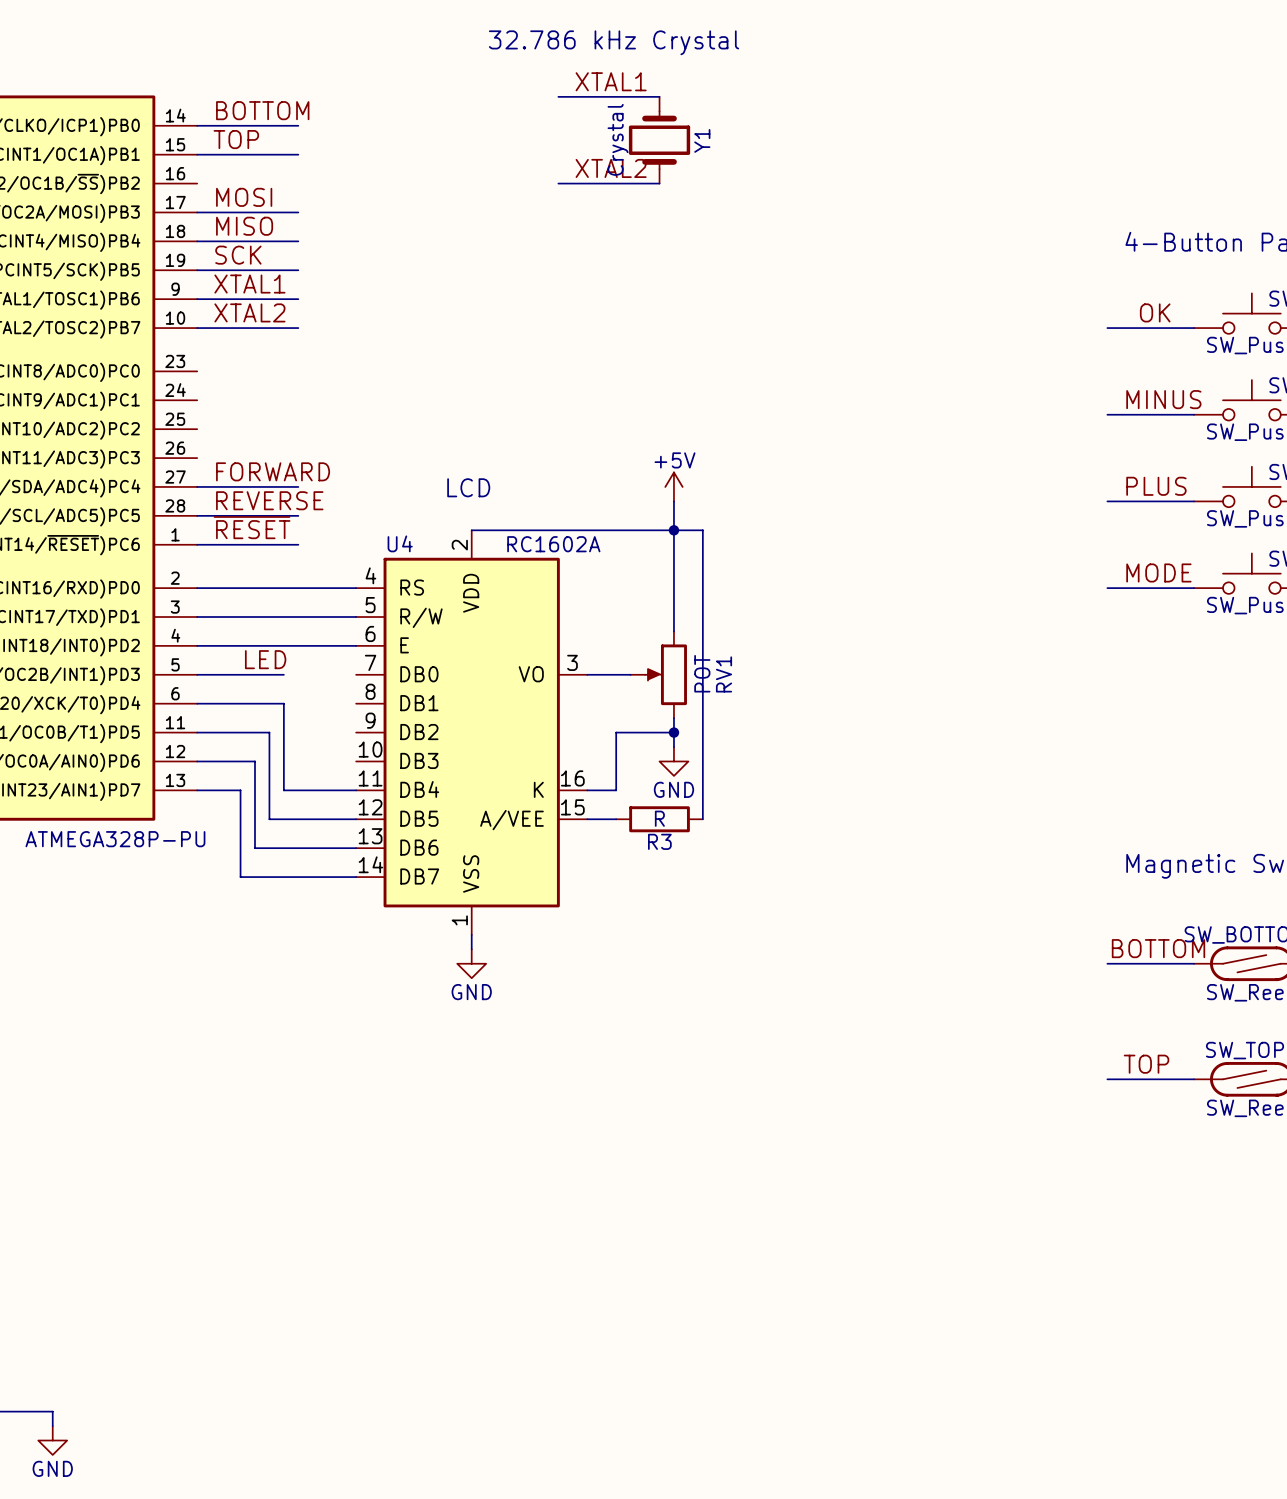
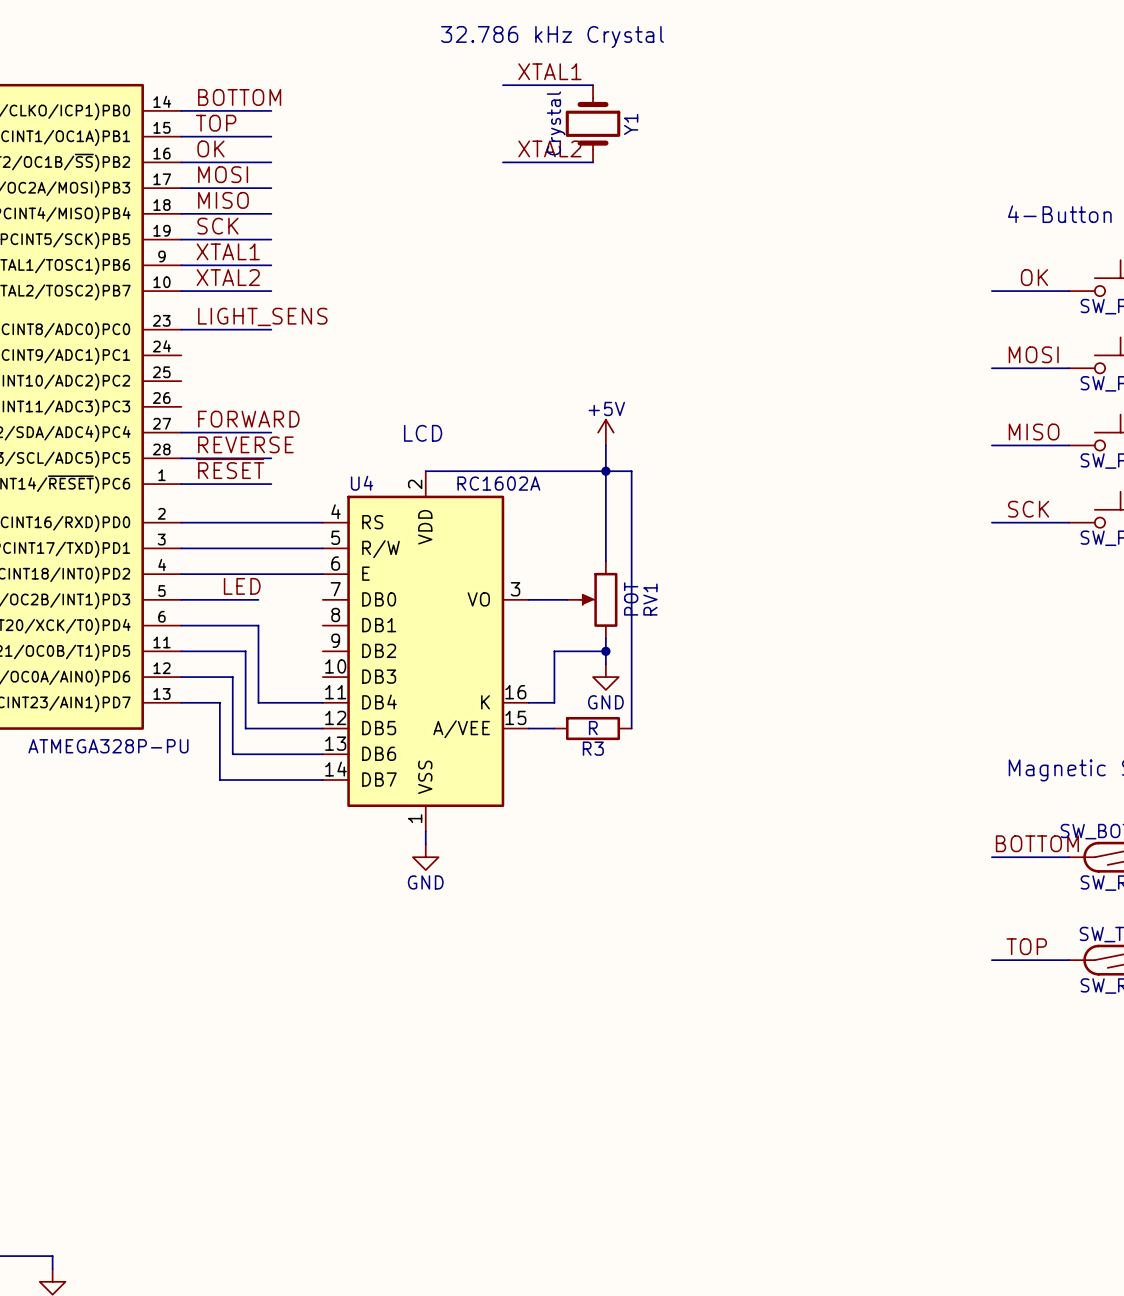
label: none -> OK (210, 148)
wire: none -> (181, 162) (271, 162)
label: none -> LIGHT_SENS (262, 316)
wire: none -> (181, 329) (271, 329)
label: MINUS (1163, 399) -> MOSI (1033, 354)
label: PLUS (1156, 486) -> MISO (1034, 431)
label: MODE (1158, 572) -> SCK (1028, 509)

